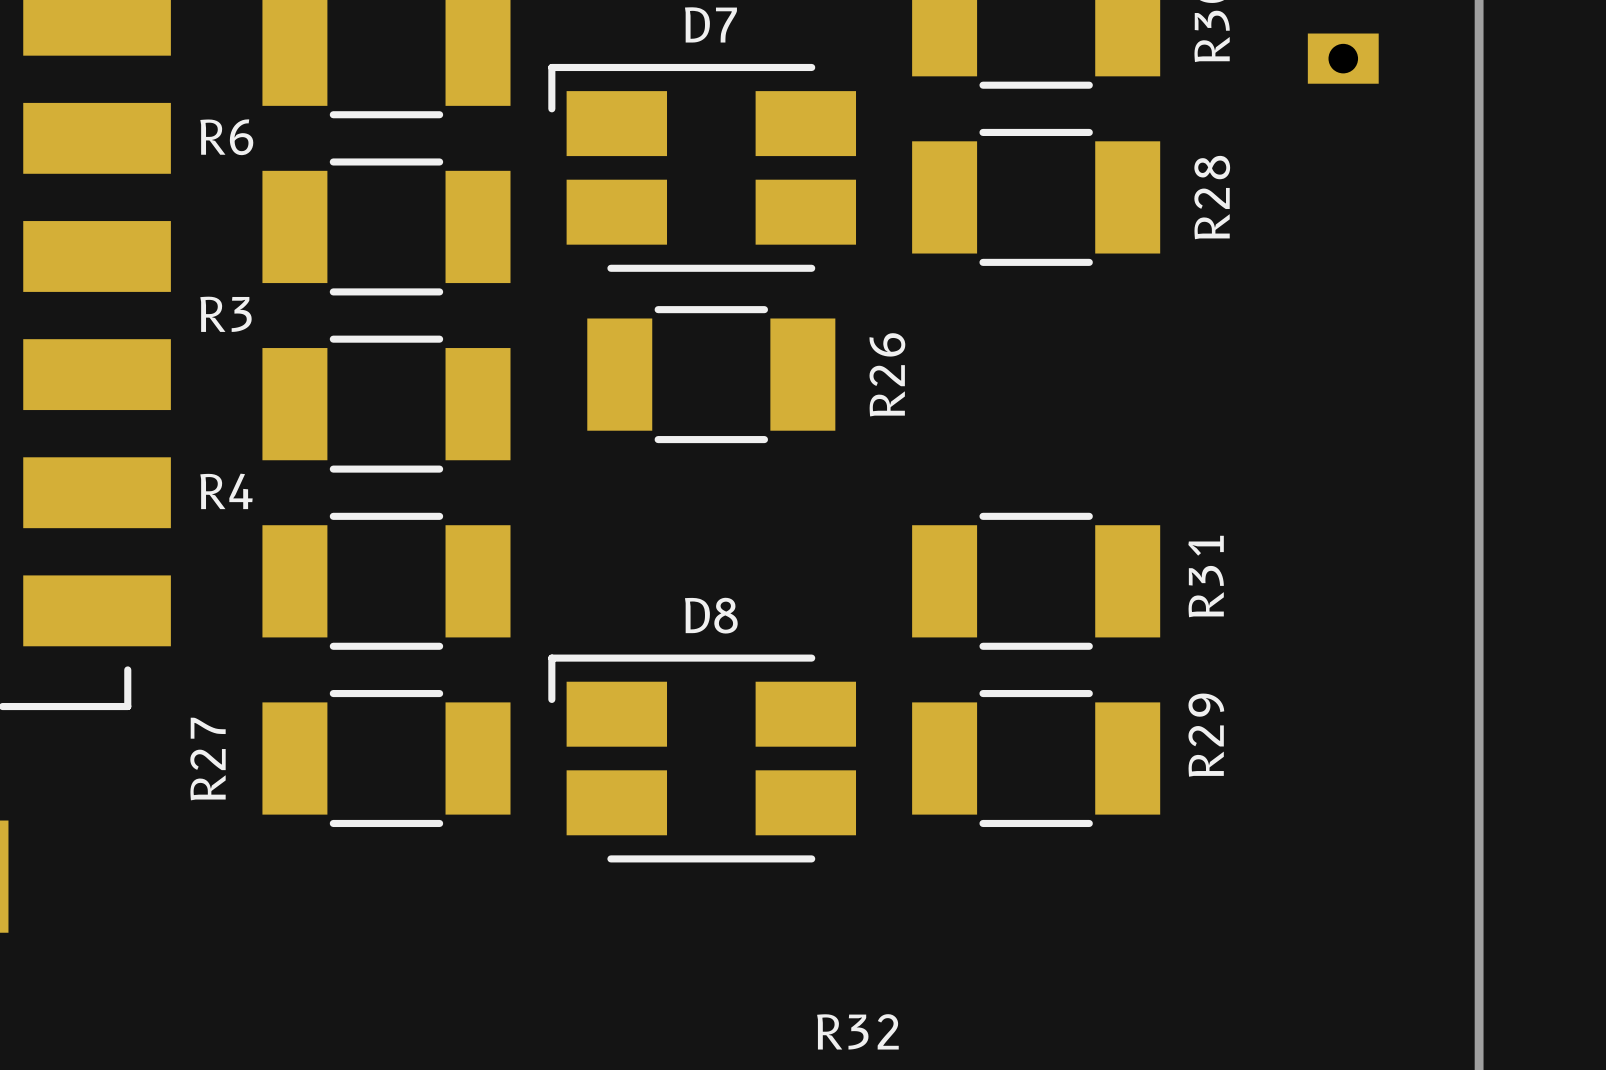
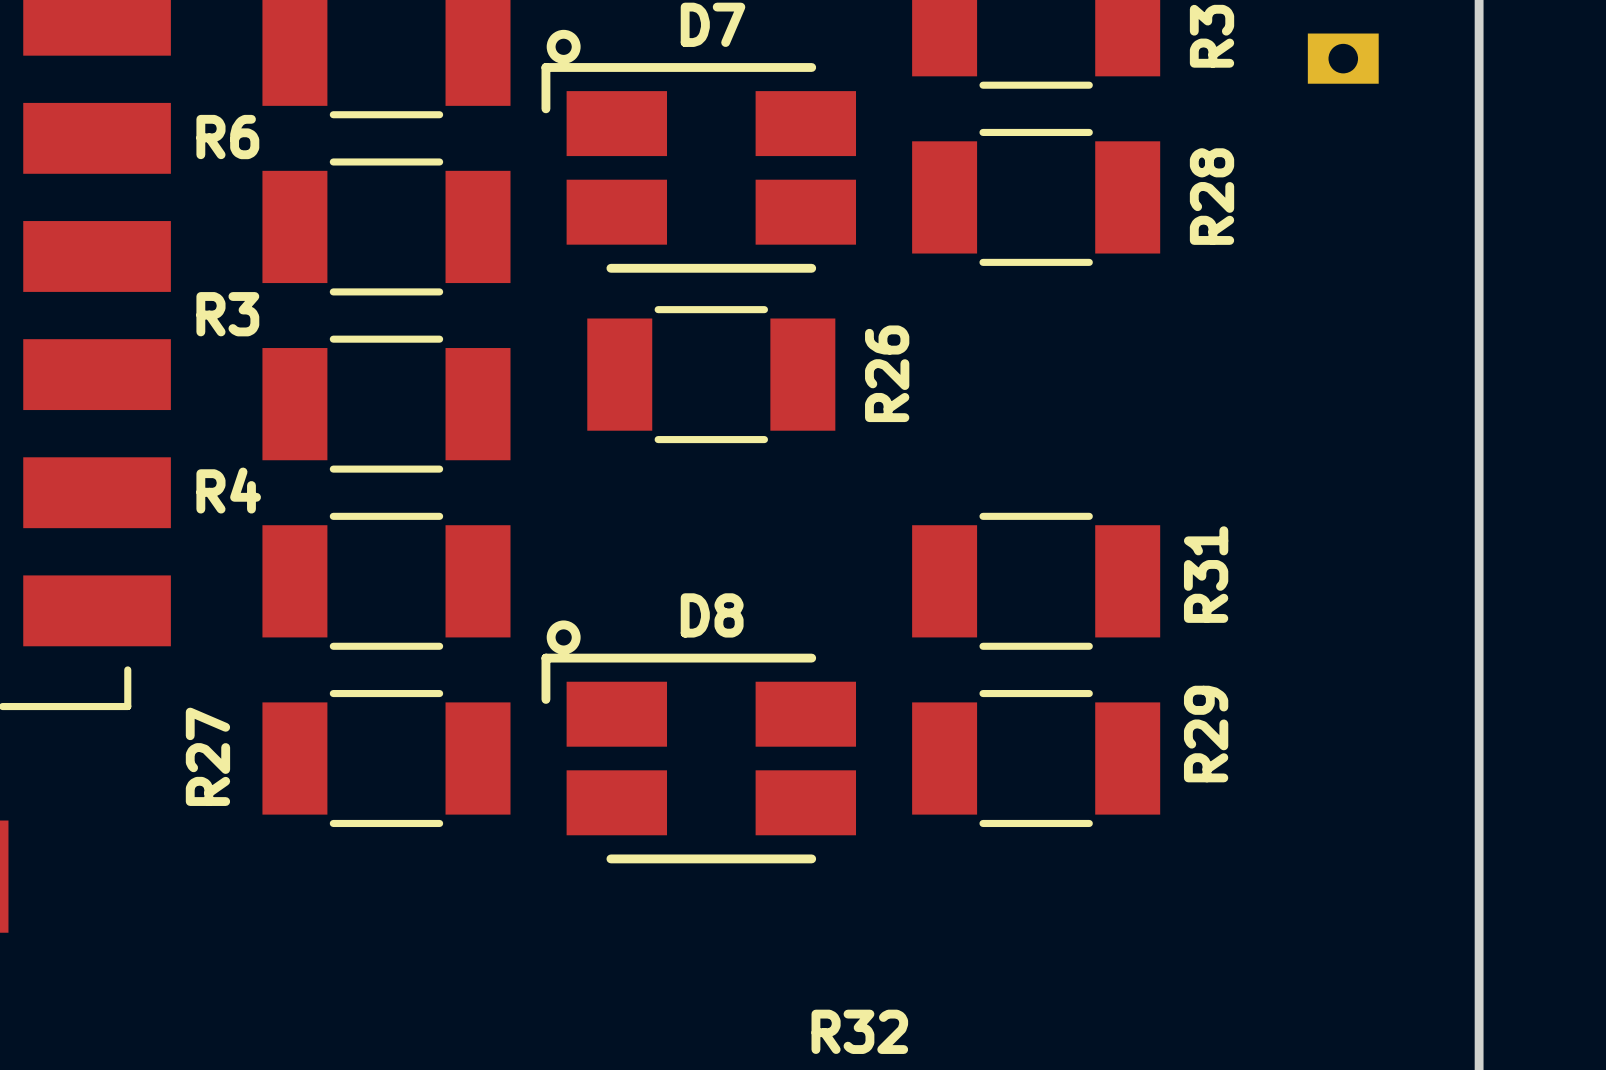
D7 footprint: [548, 63, 857, 272] -> [541, 29, 857, 273]
D8 footprint: [548, 654, 857, 863] -> [541, 620, 857, 864]

